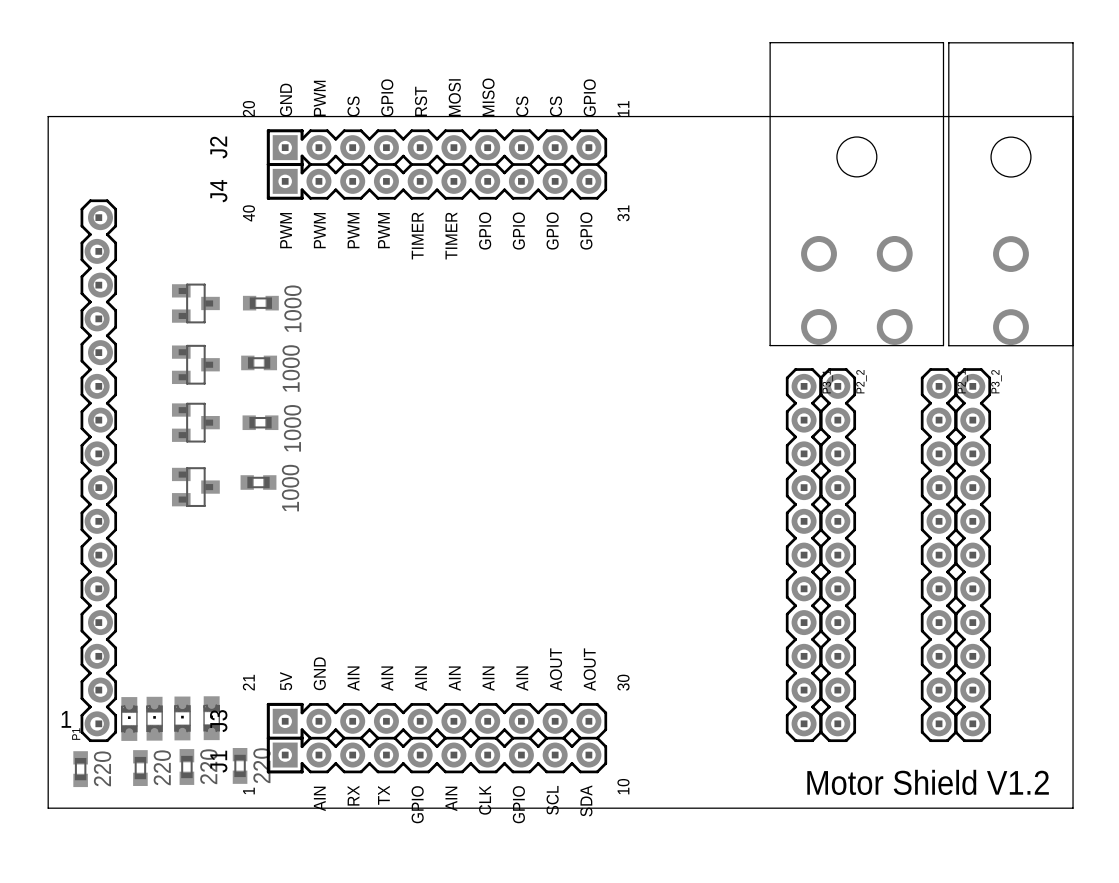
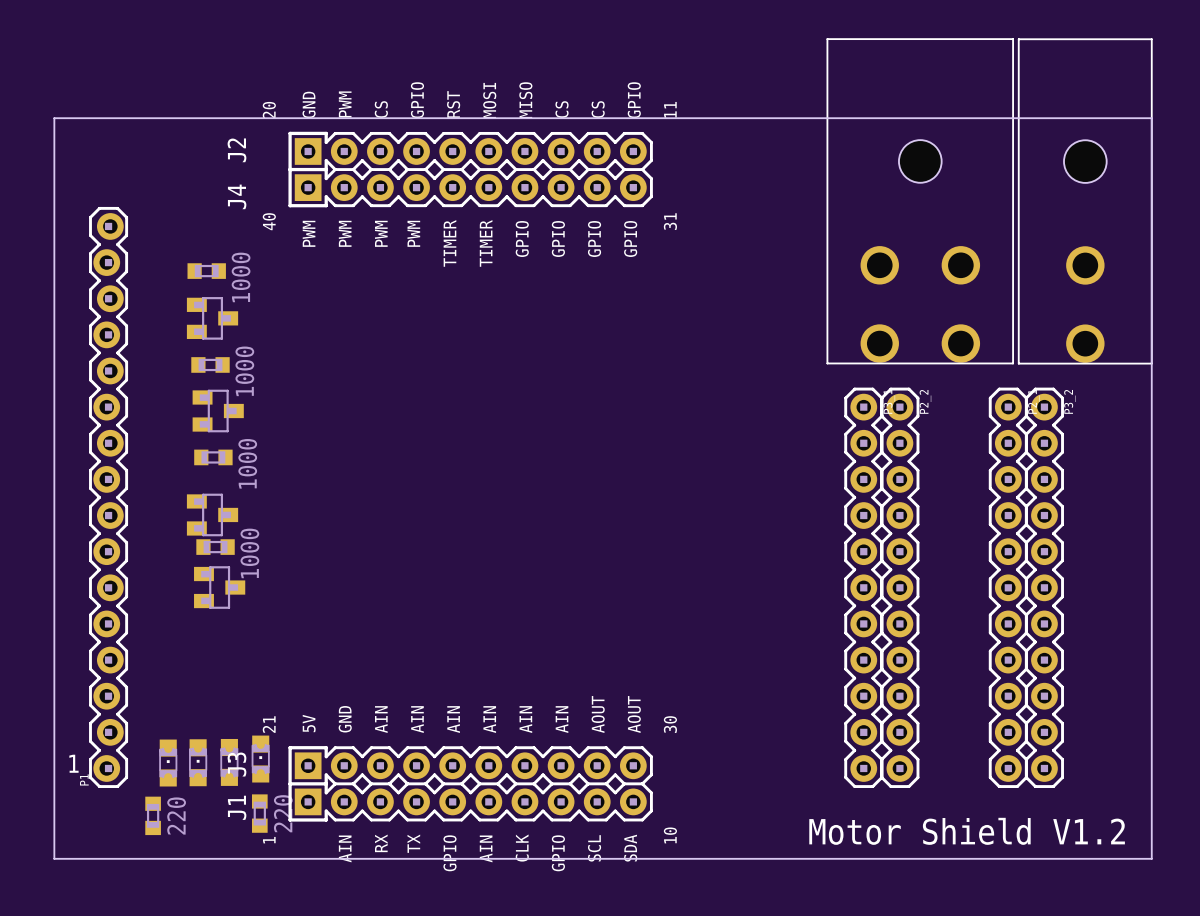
part: none -> 1000 (206, 271)
part: 1000 (260, 303) -> none
part: none -> 1000 (210, 364)
part: 1000 (259, 362) -> none
part position: (195, 364) -> (218, 411)
part footprint: [171, 402, 220, 443] -> [194, 449, 233, 466]
part: 1000 (260, 422) -> none
part value: none -> 1000 (247, 463)
part: 1000 (258, 482) -> none
part: none -> 1000 (215, 547)
part: none -> (219, 587)
part position: (129, 718) -> (260, 759)
part: 220 (186, 767) -> none
part: 220 (80, 769) -> none

